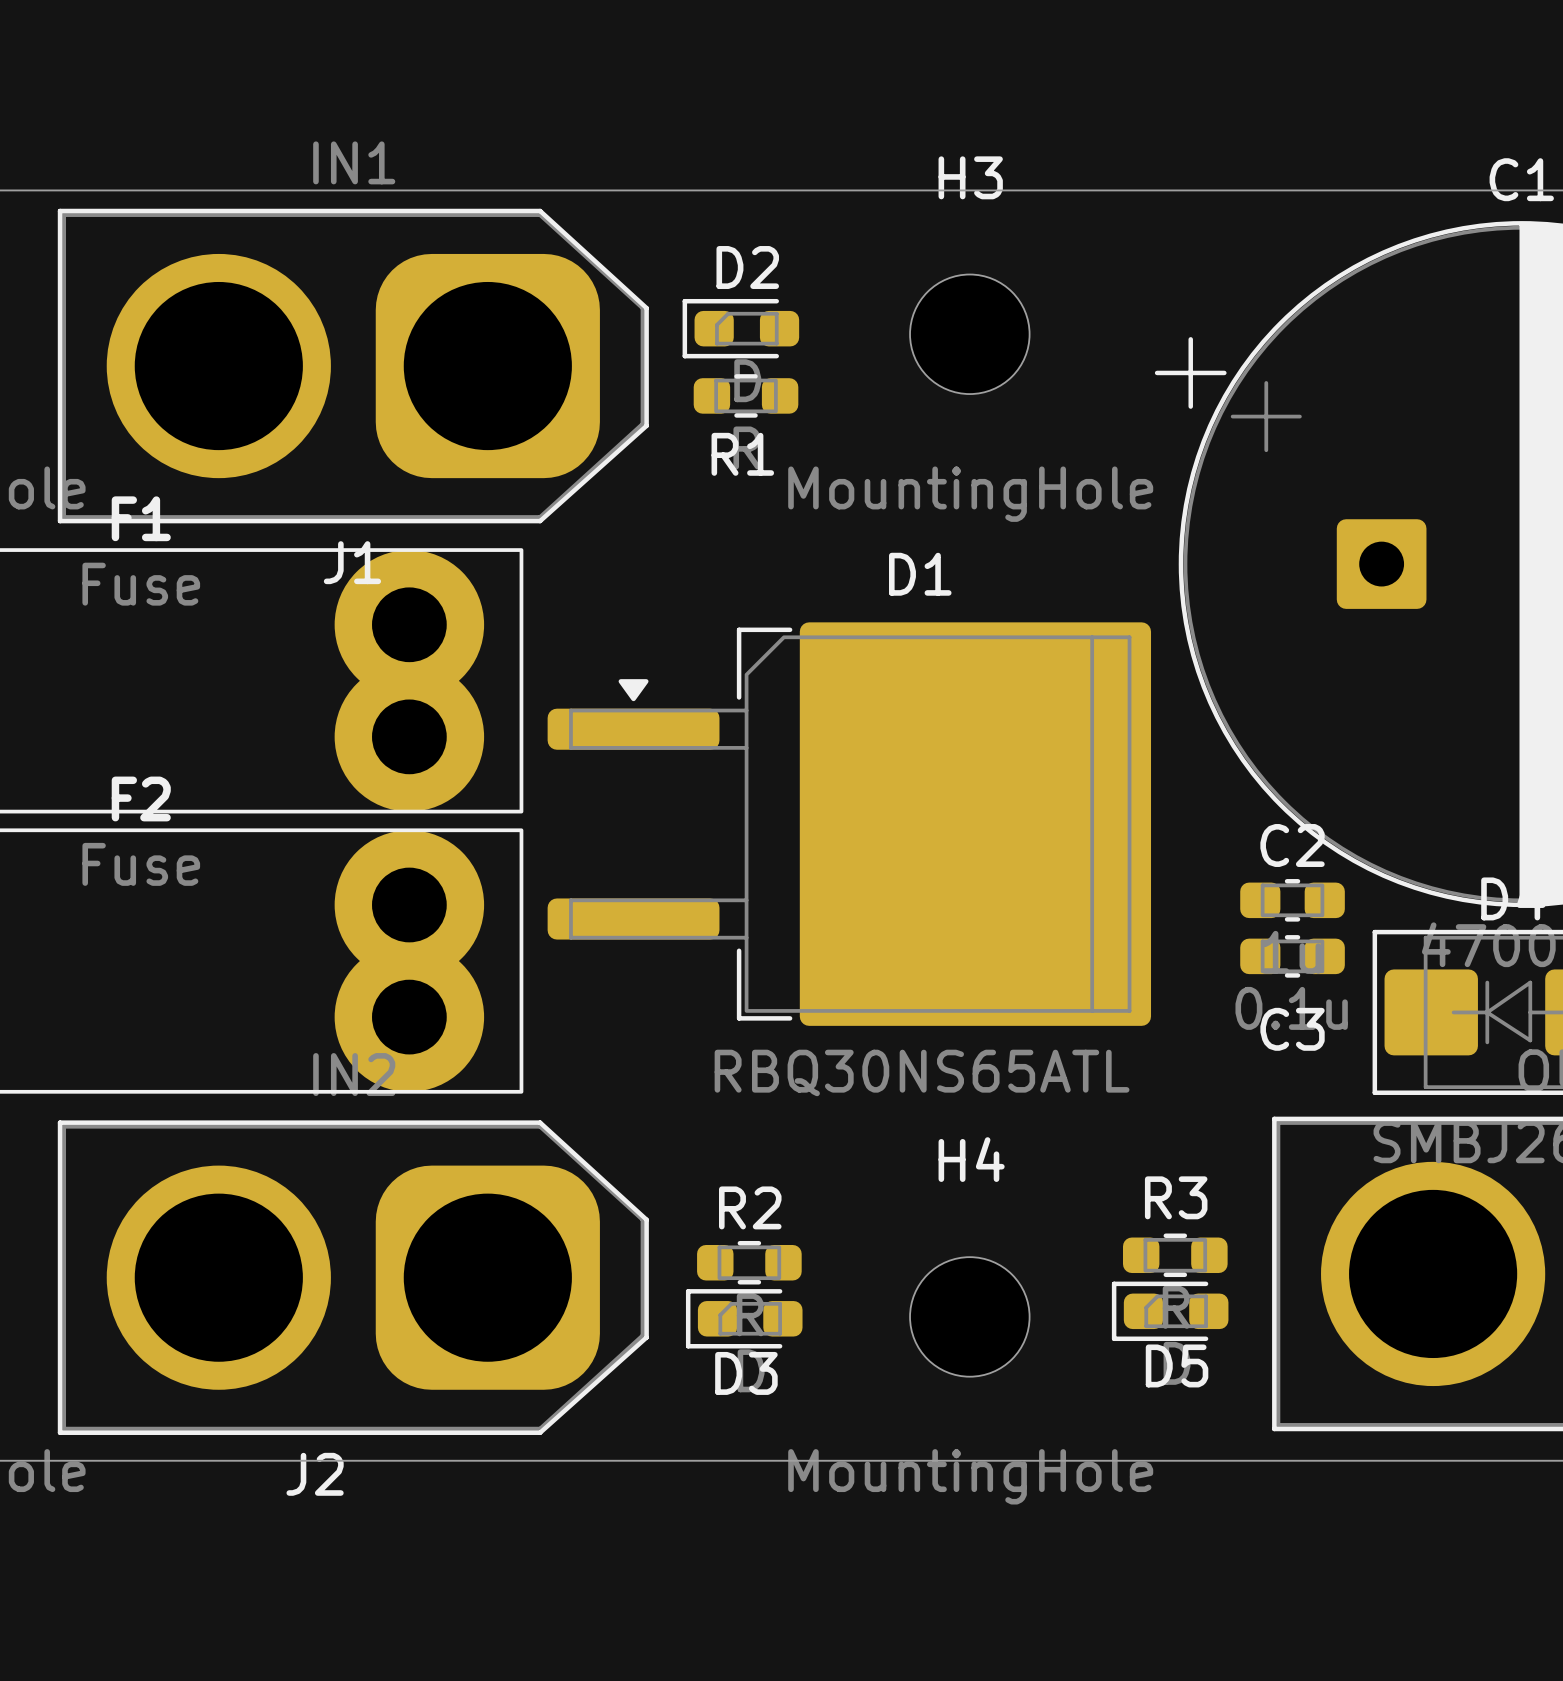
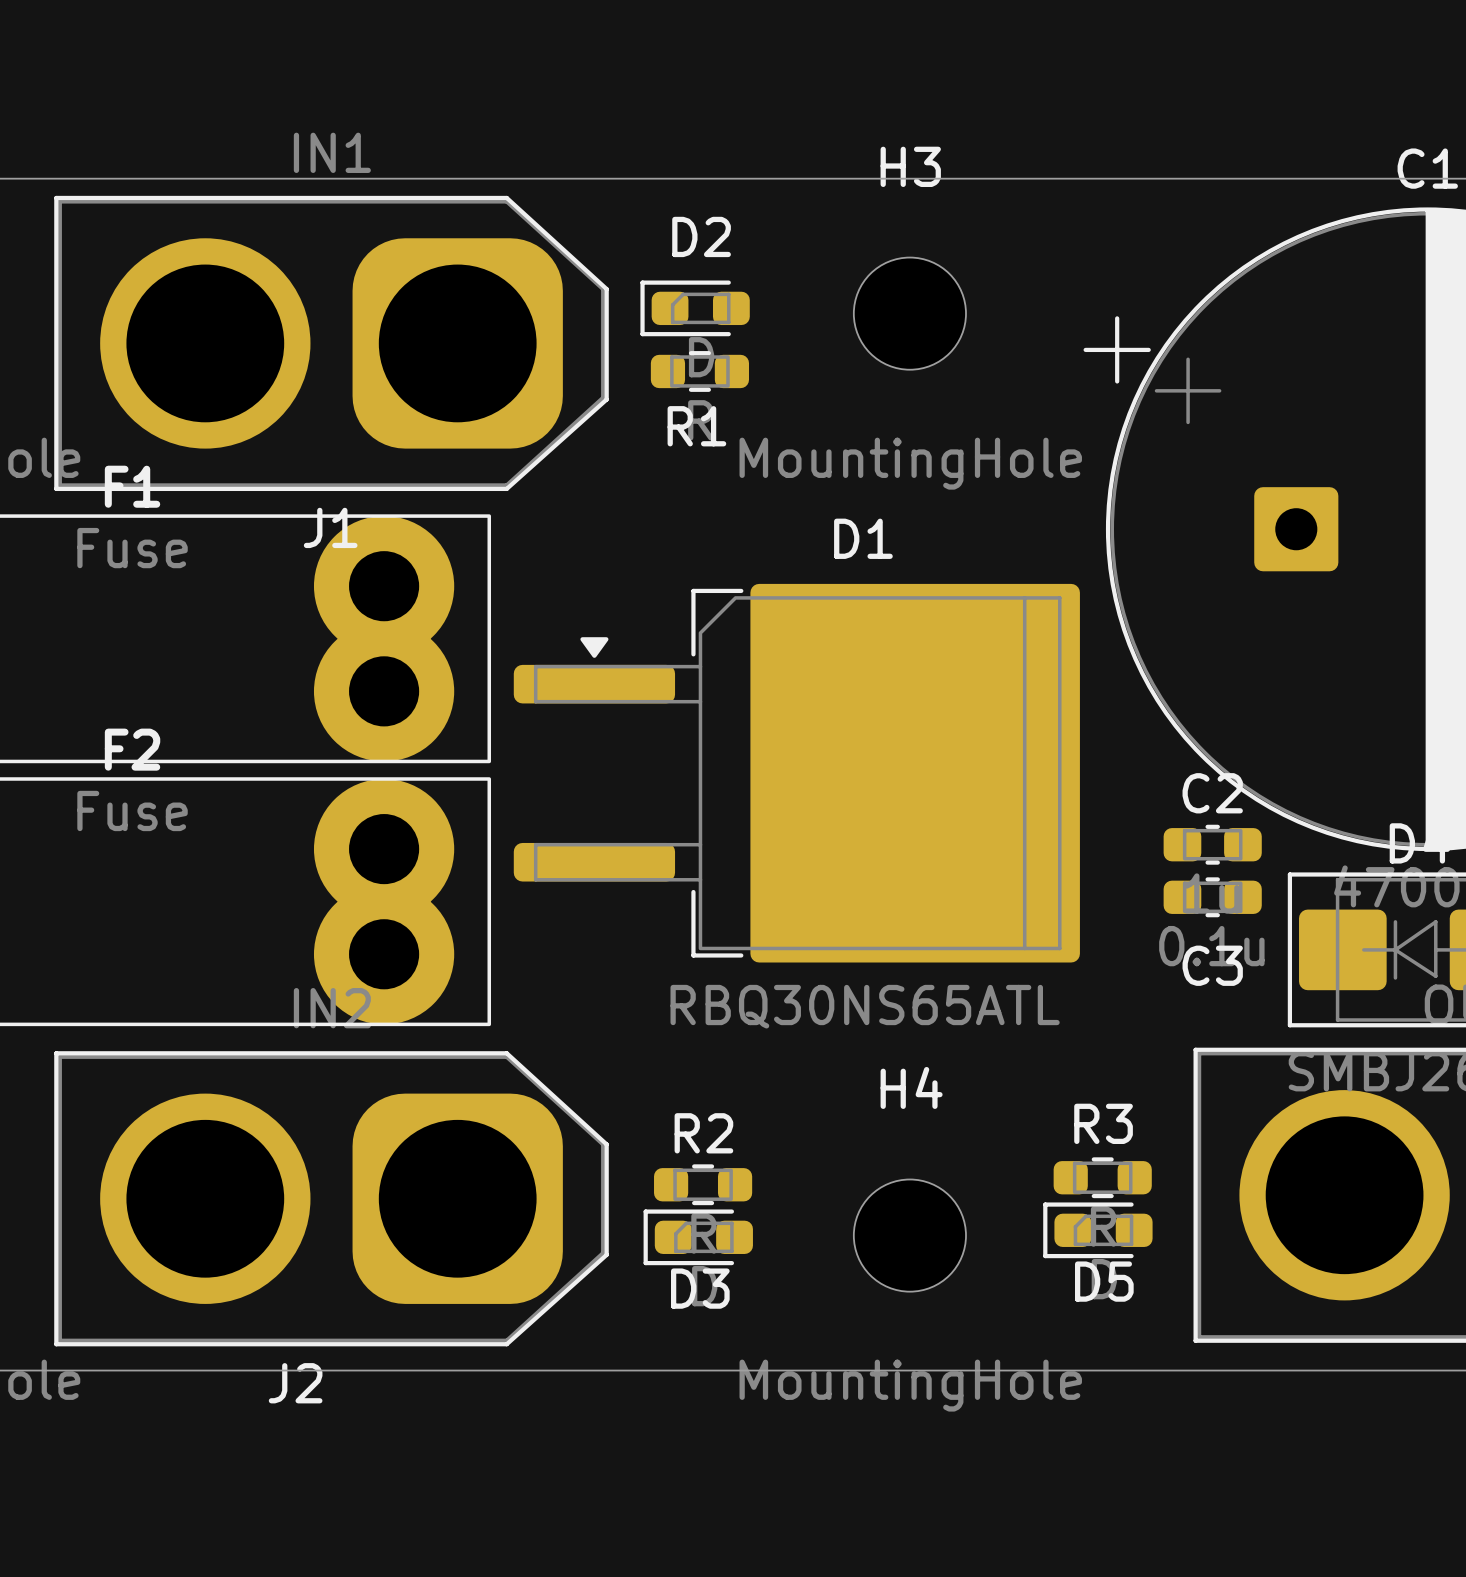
D2 name position: D2 (747, 267) -> D2 (701, 236)

